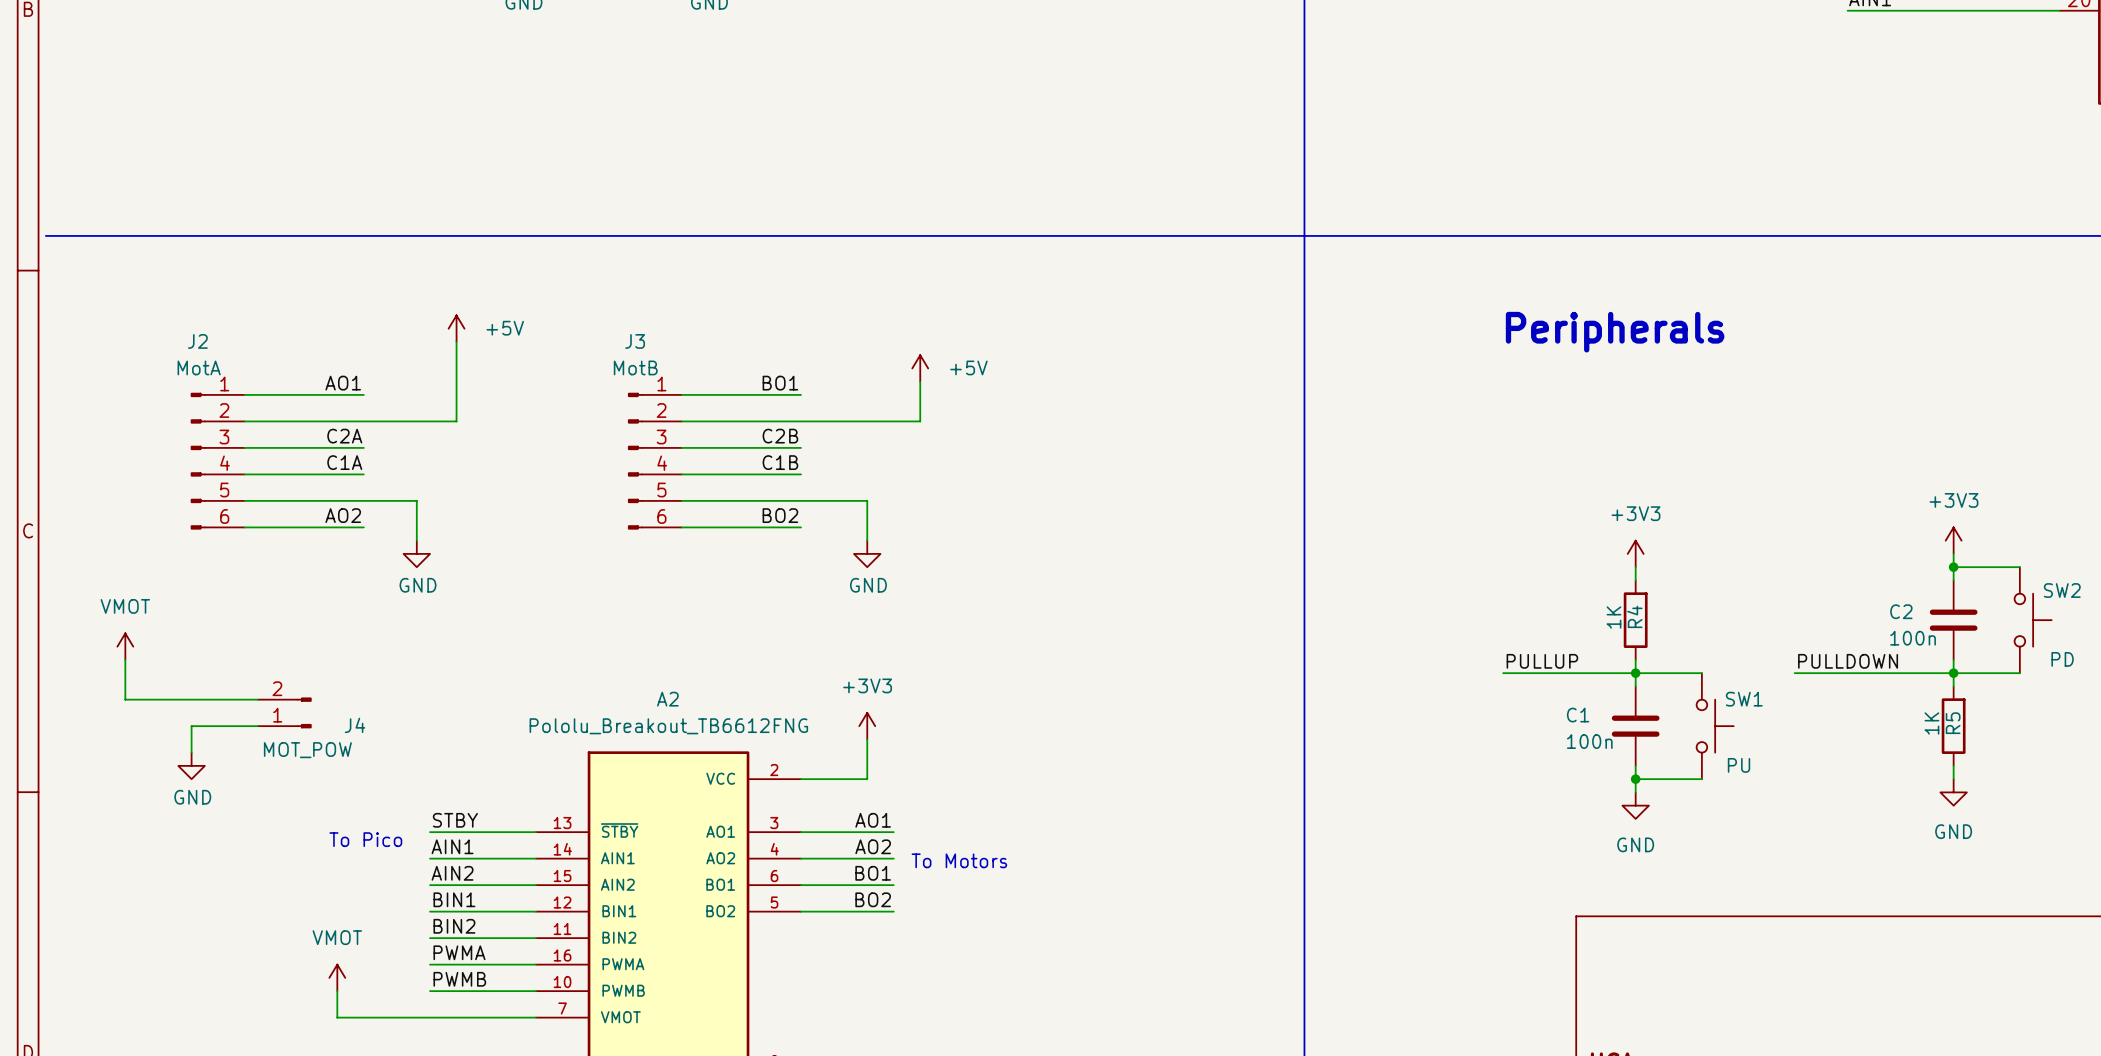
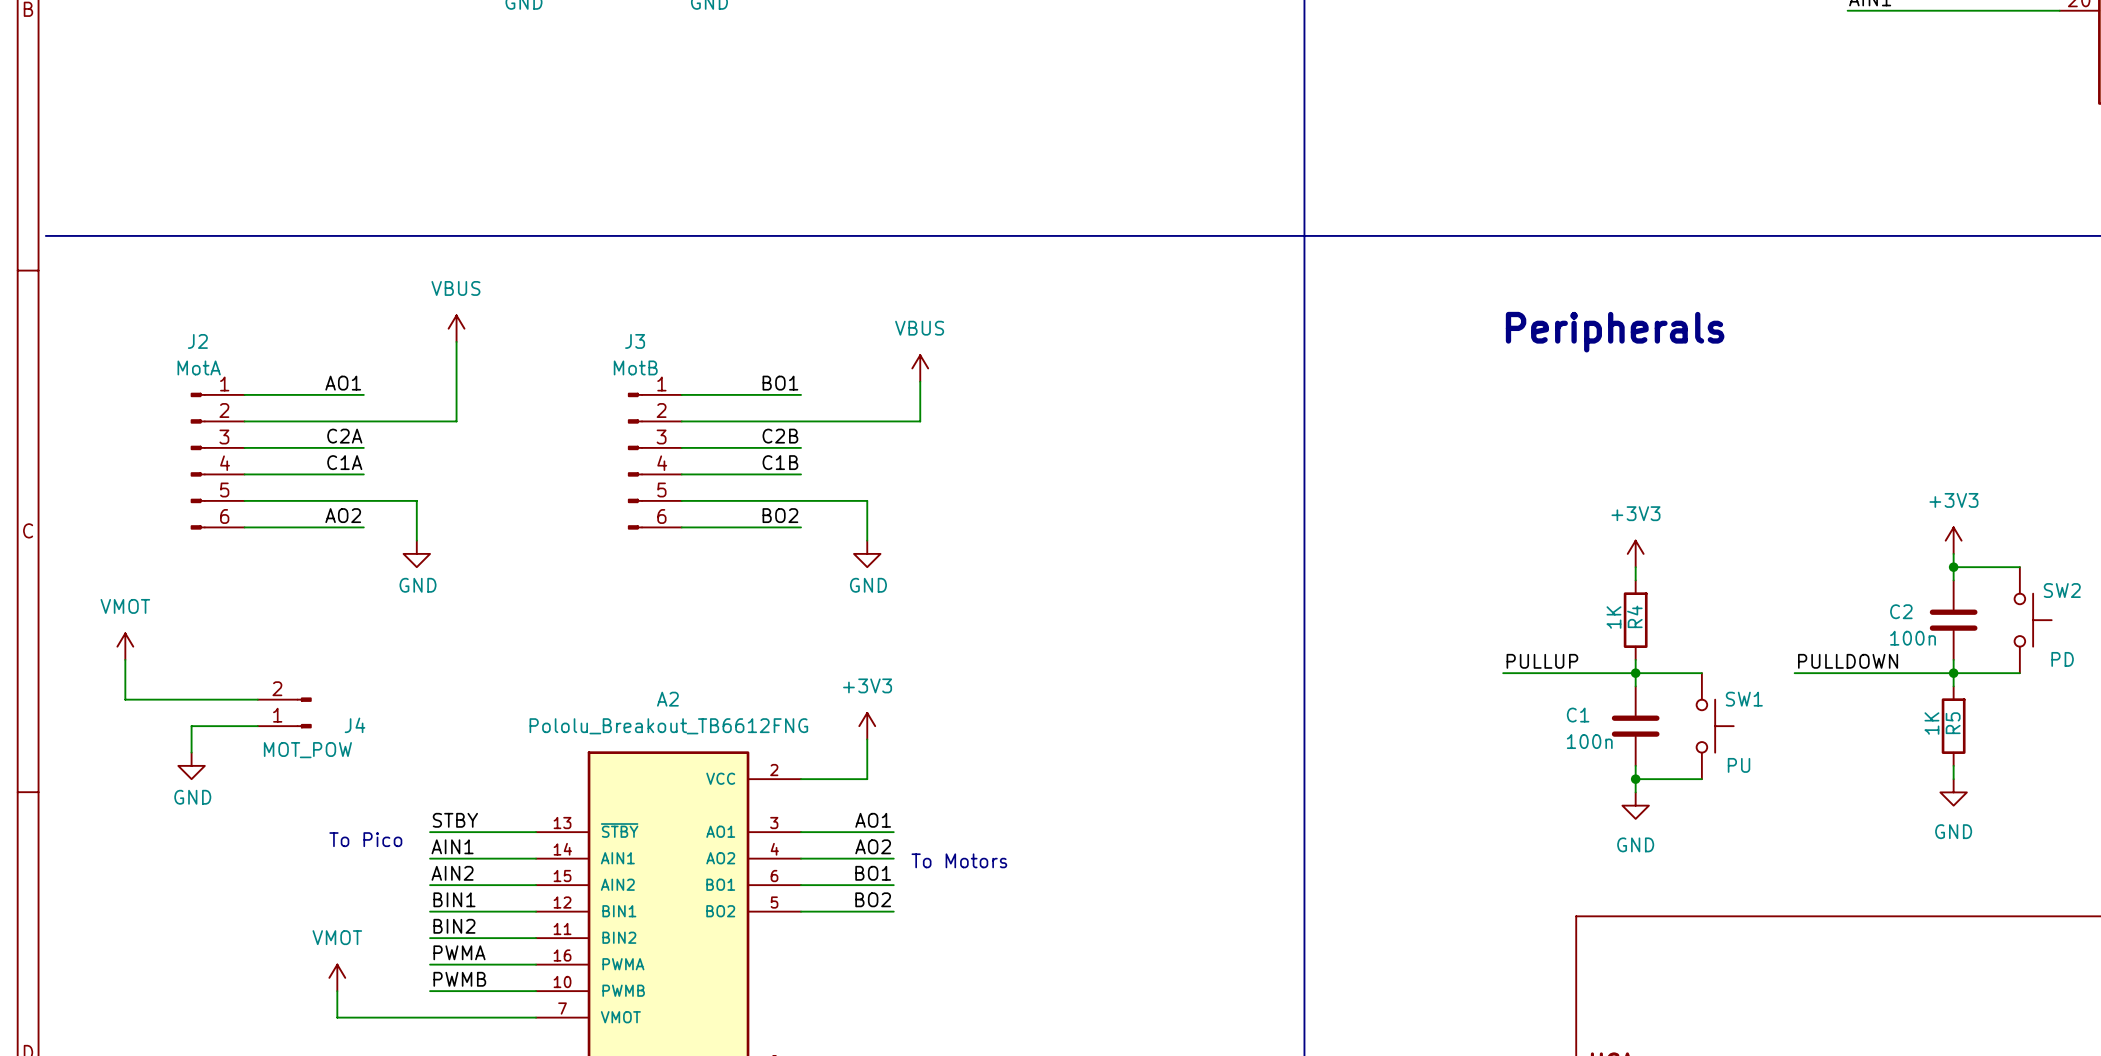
power symbol: +5V (456, 328) -> VBUS (456, 328)
power symbol: +5V (920, 368) -> VBUS (920, 368)

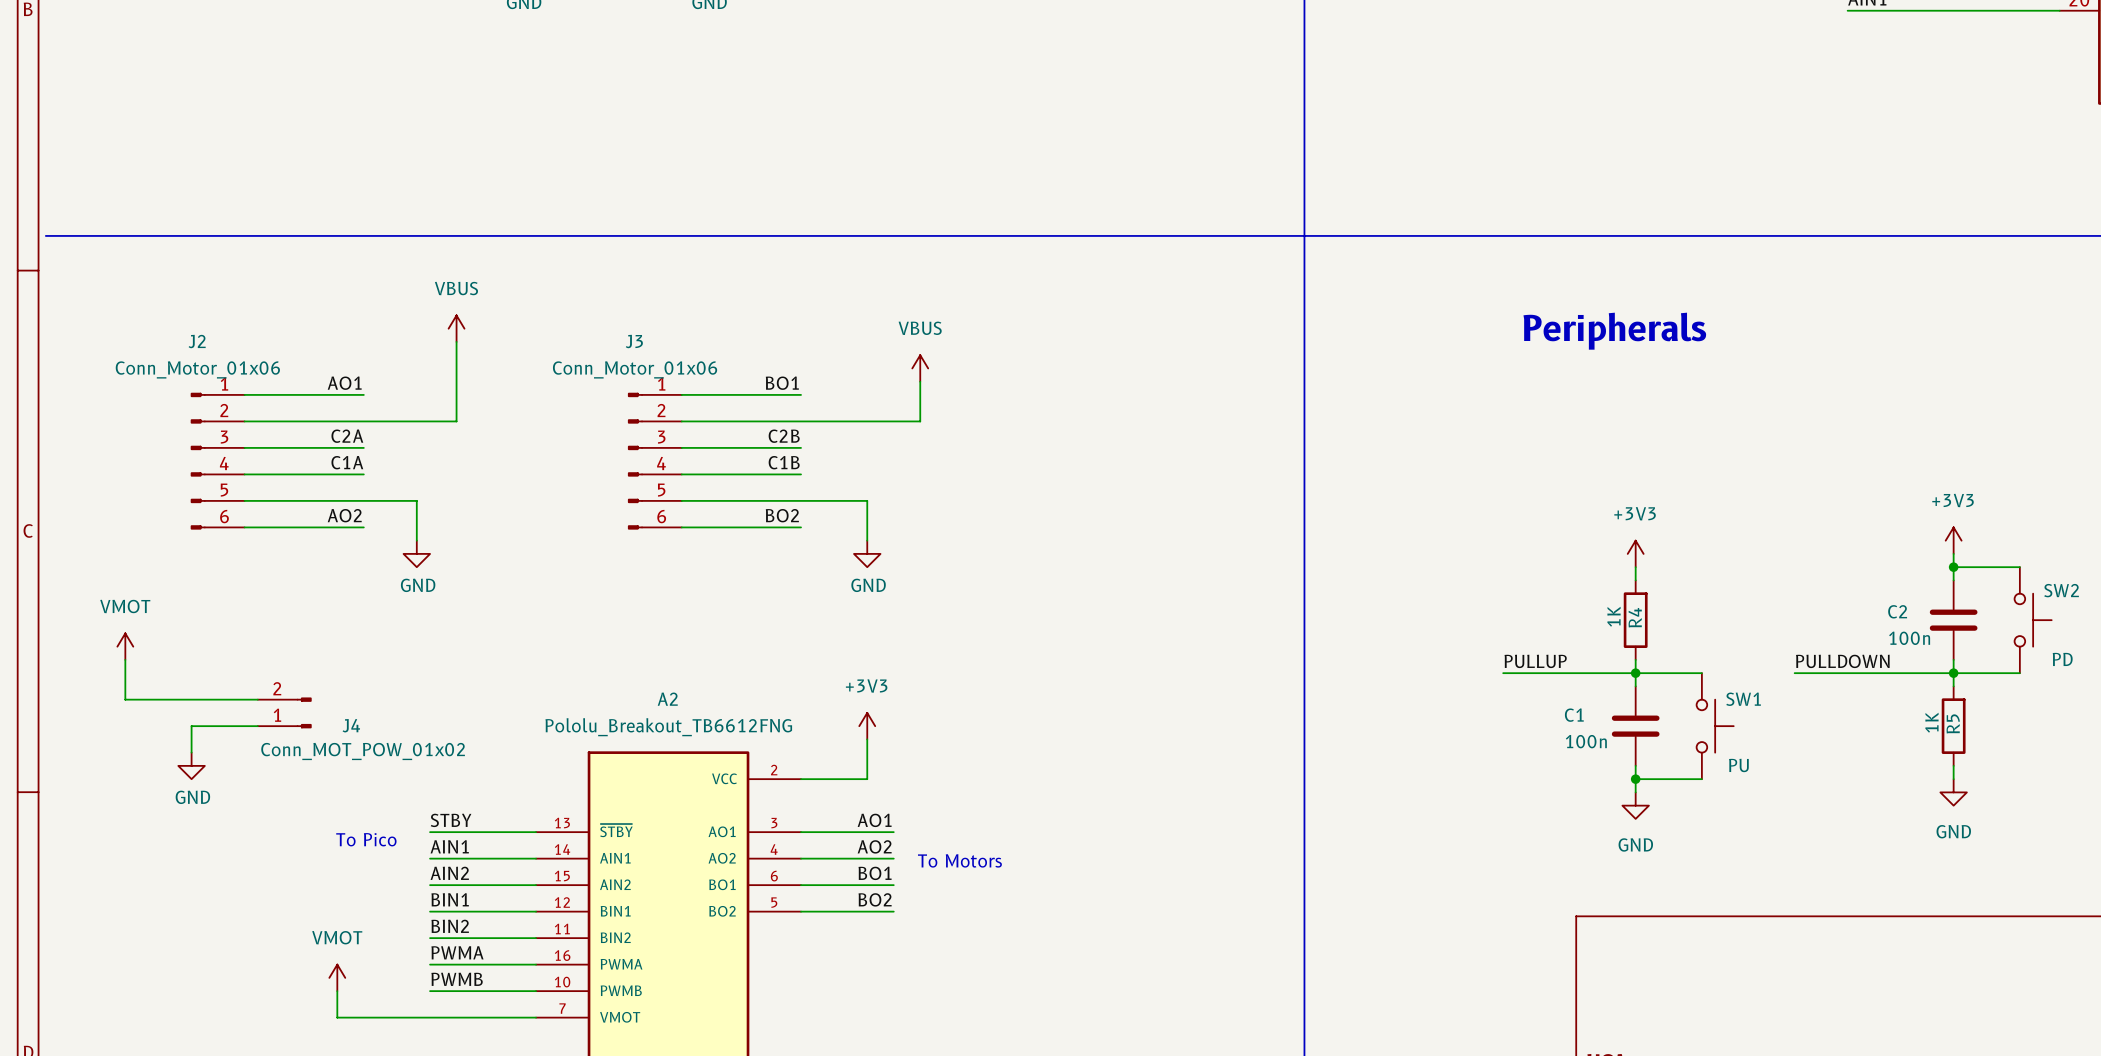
J2 value: MotA (199, 367) -> Conn_Motor_01x06 (197, 369)
J3 value: MotB (635, 367) -> Conn_Motor_01x06 (635, 369)
J4 value: MOT_POW (307, 750) -> Conn_MOT_POW_01x02 (363, 751)

